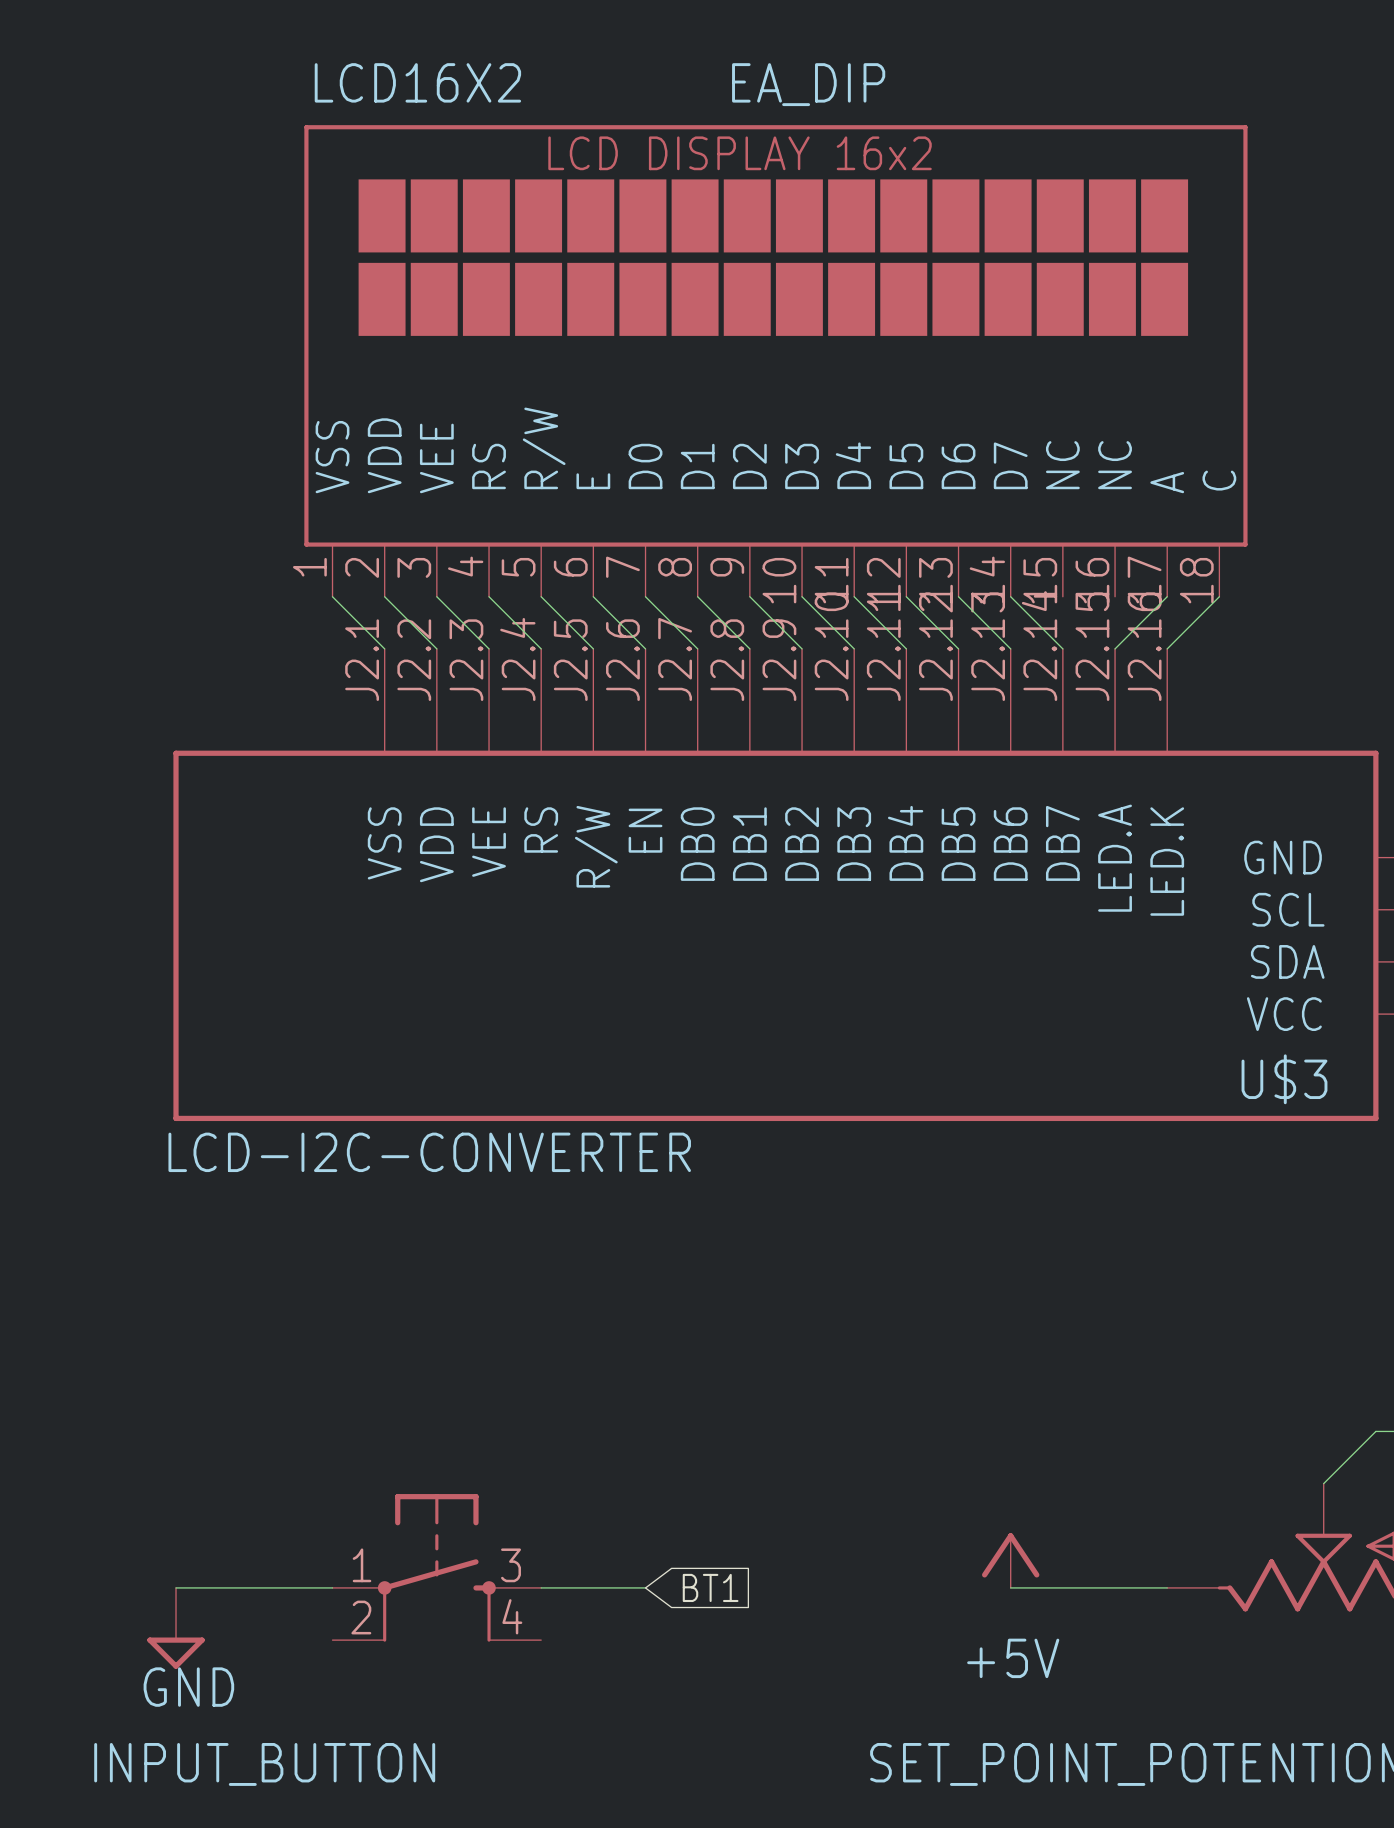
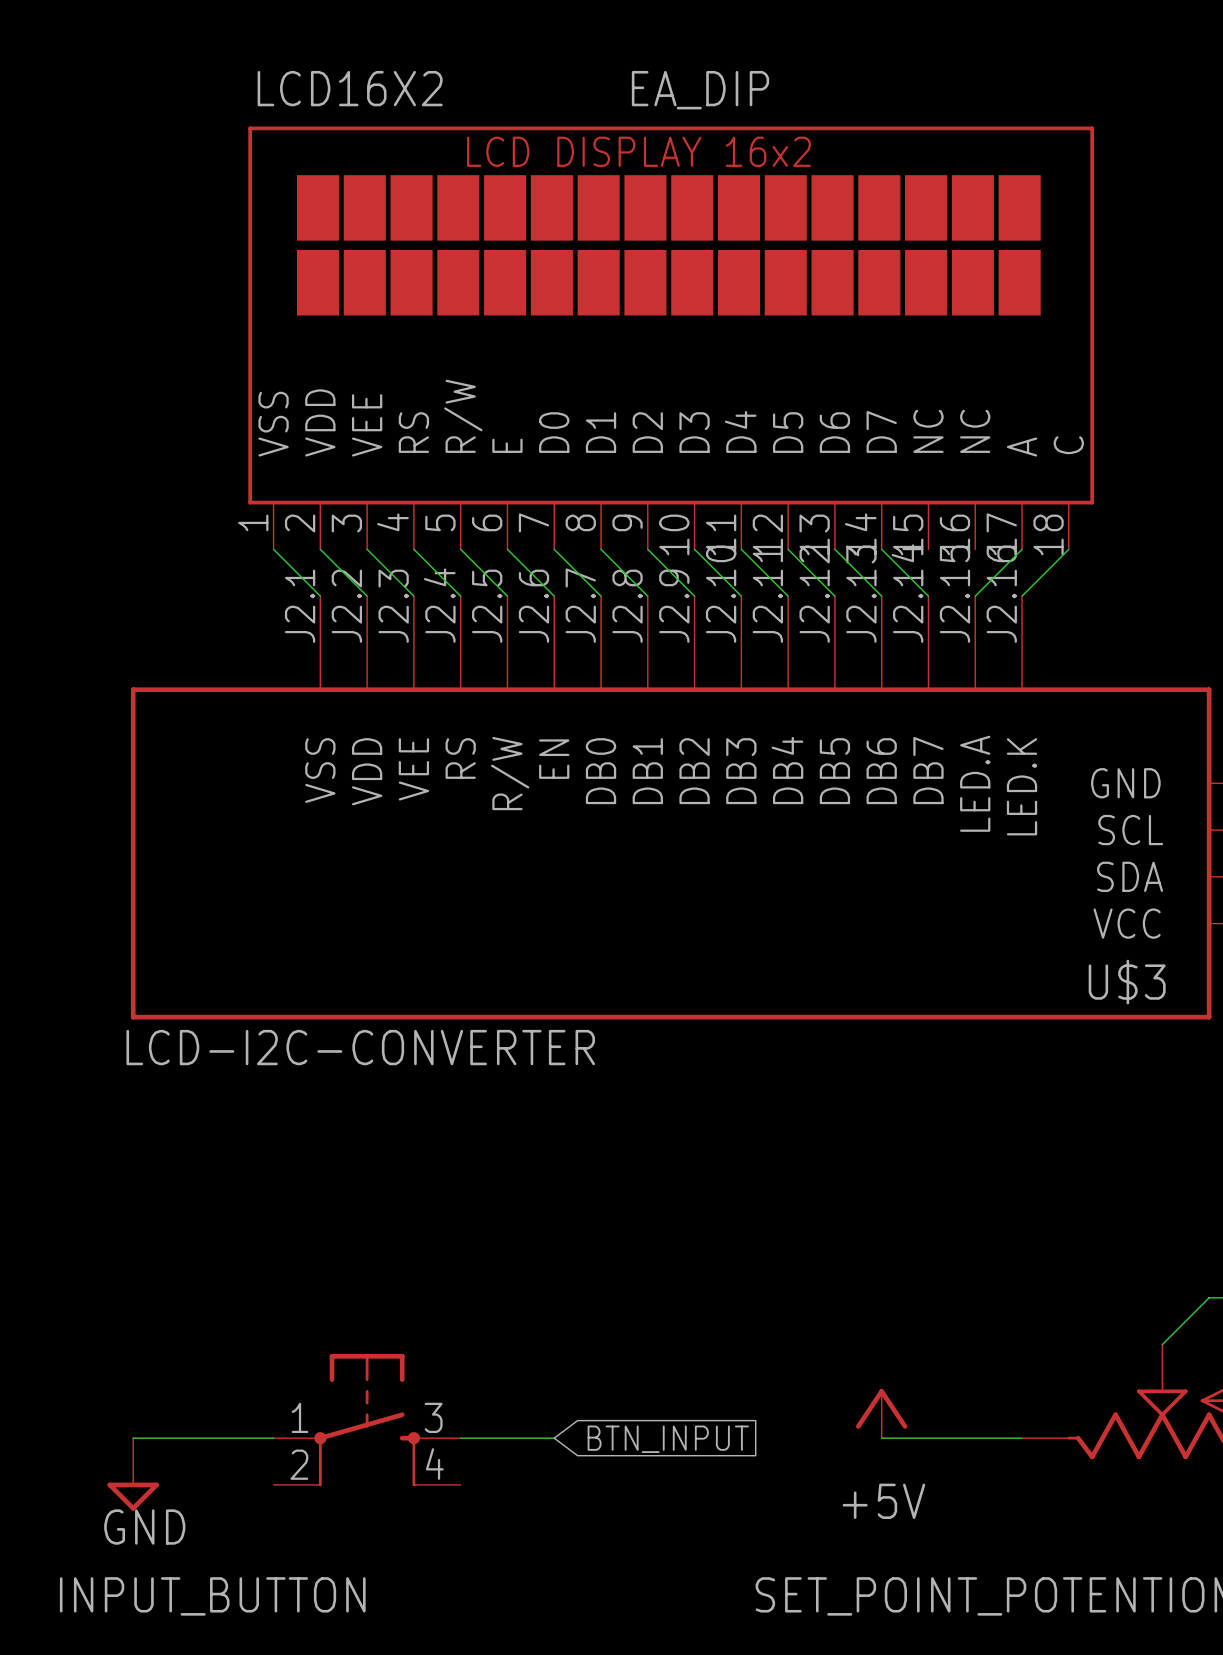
global label: BT1 (710, 1587) -> BTN_INPUT (668, 1439)

